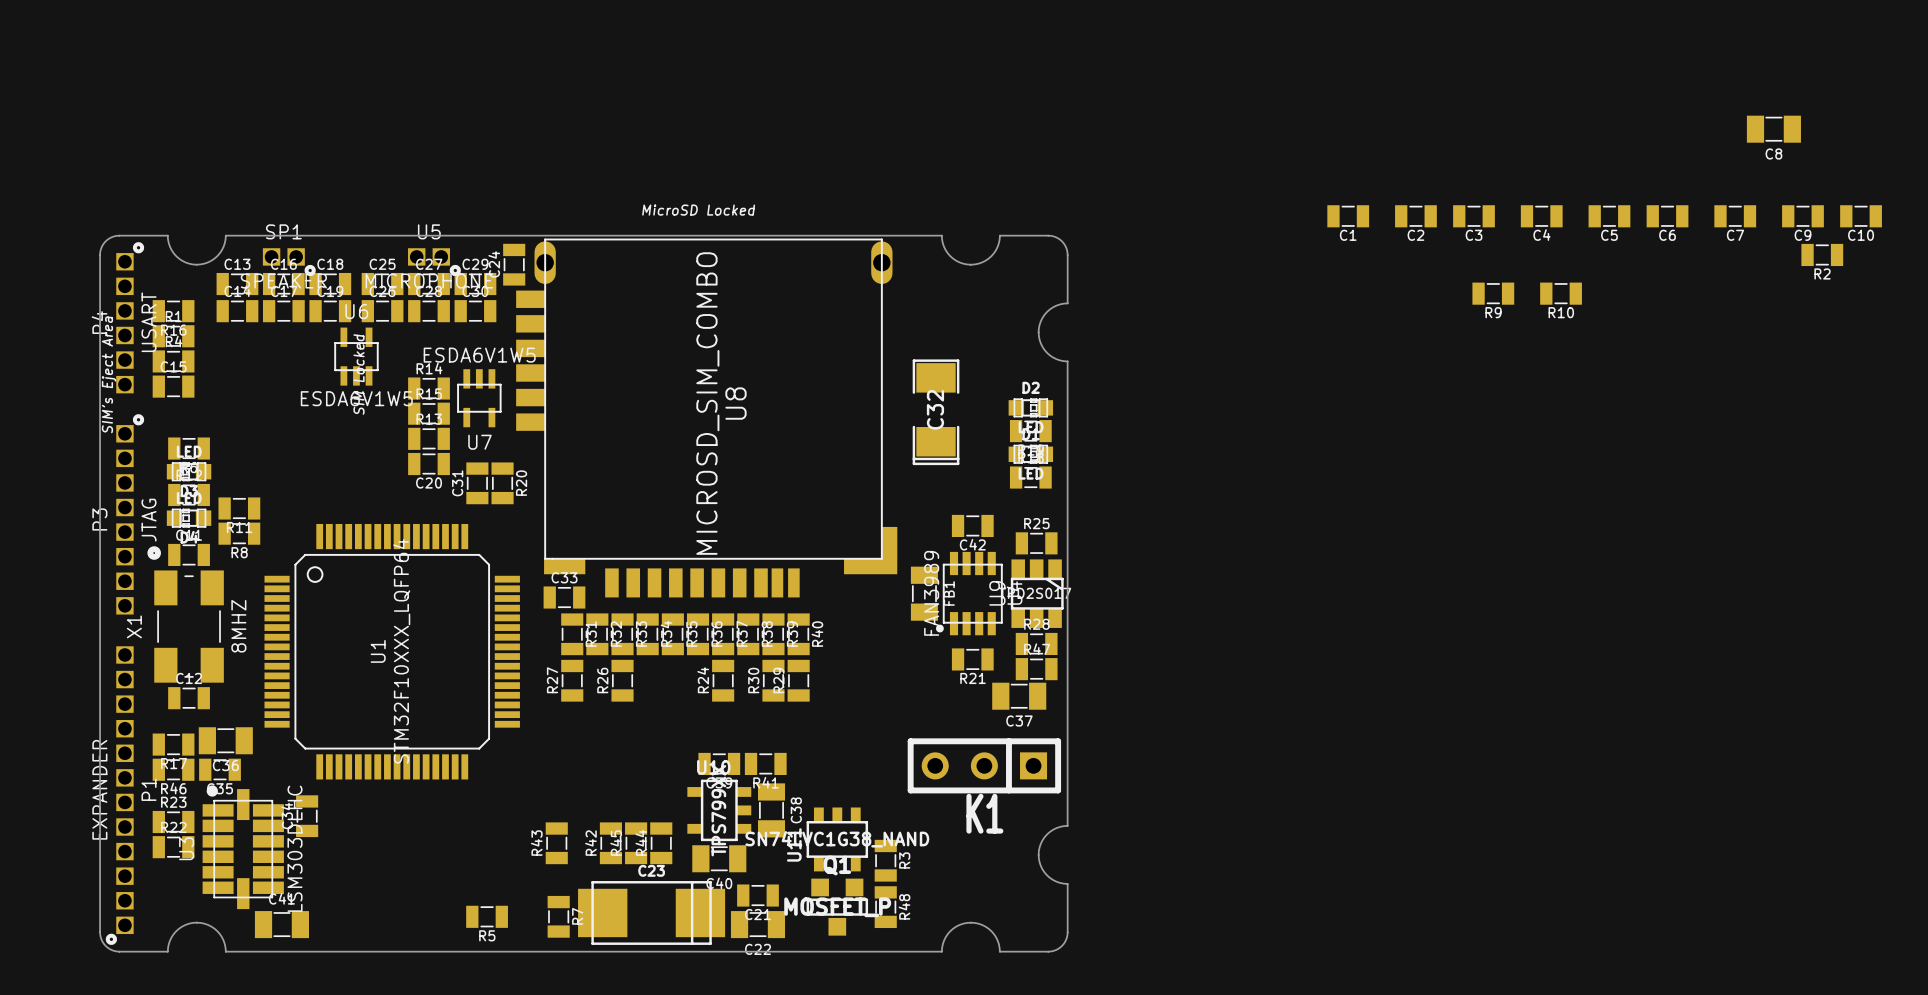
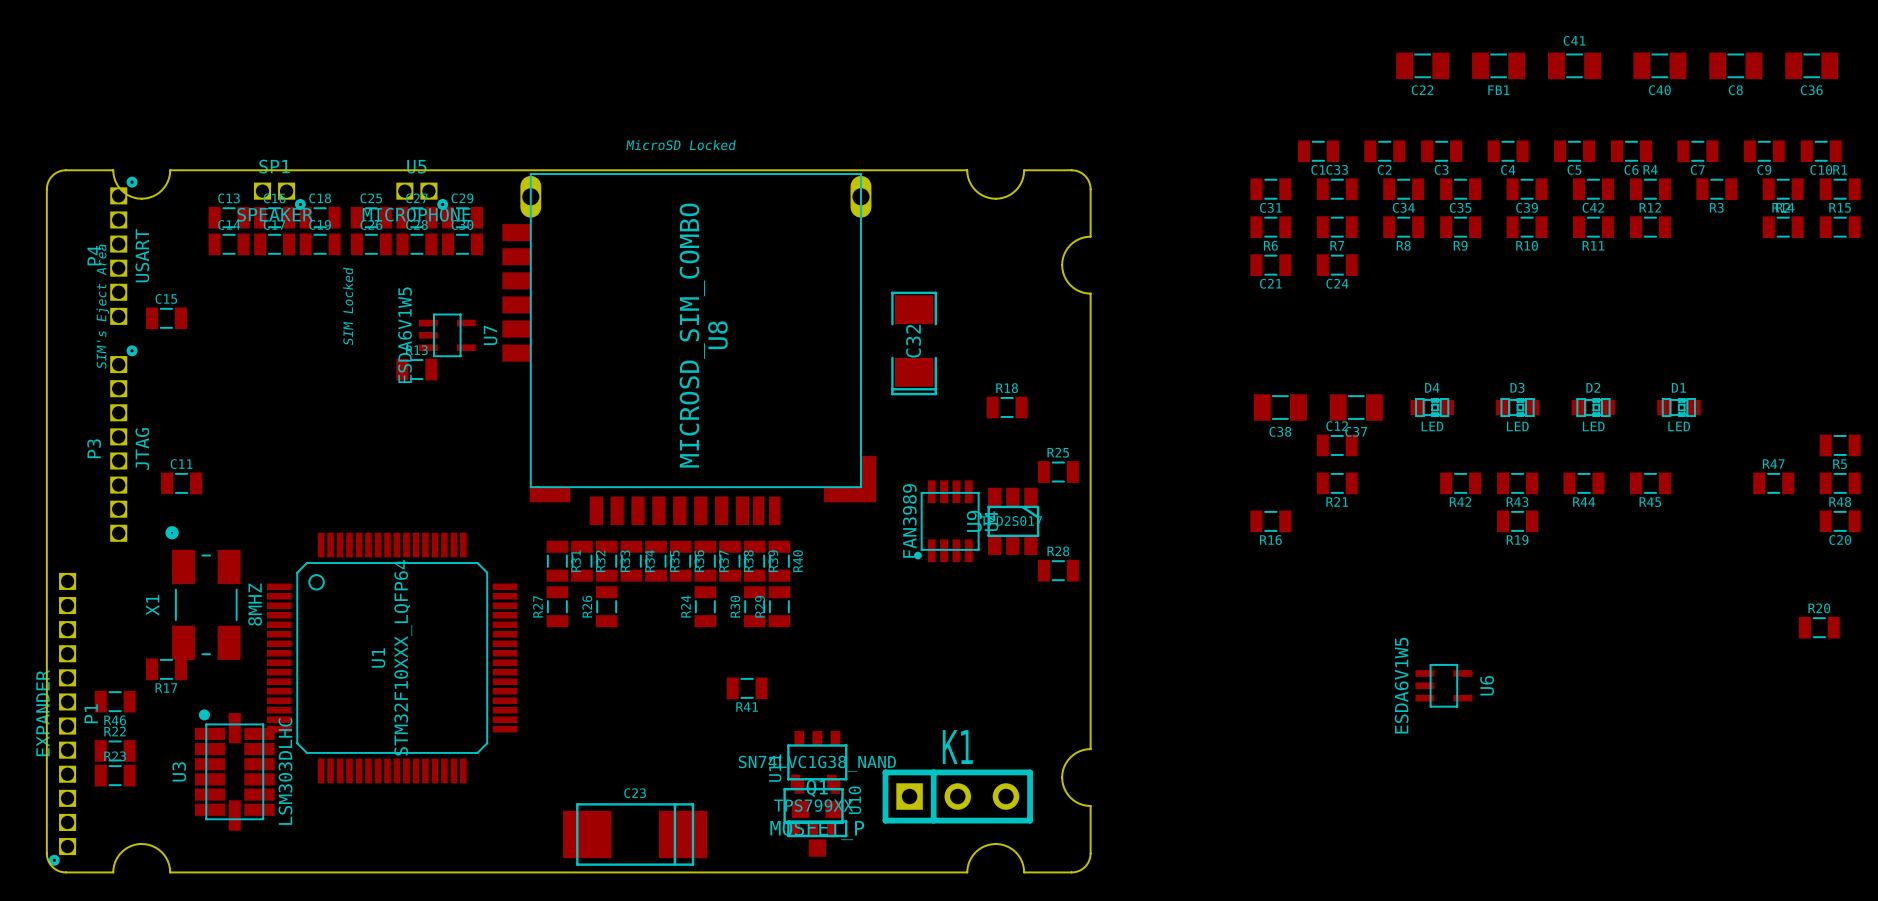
board edge: (225, 235) (223, 246) (217, 256) (200, 264) (189, 263) (179, 258) (169, 246) (167, 235) (114, 236) (104, 243) (100, 255) (100, 934) (104, 944) (114, 951) (167, 951) (171, 937) (179, 928) (189, 923) (200, 922) (217, 931) (223, 940) (225, 951) -> (217, 170) (170, 170) (168, 181) (161, 190) (145, 198) (134, 197) (124, 192) (115, 181) (113, 170) (60, 170) (50, 177) (46, 189) (47, 858) (52, 866) (60, 871) (113, 872) (115, 861) (124, 849) (134, 844) (145, 844) (161, 852) (168, 861) (170, 872) (217, 872)
board edge: (941, 235) (947, 253) (956, 260) (967, 264) (978, 263) (988, 258) (997, 246) (999, 235) (1053, 236) (1063, 243) (1067, 255) (1067, 303) (1056, 305) (1047, 311) (1040, 321) (1038, 332) (1040, 343) (1047, 352) (1056, 359) (1067, 361) (1067, 825) (1056, 828) (1047, 834) (1040, 843) (1038, 854) (1040, 866) (1047, 875) (1056, 881) (1067, 883) (1067, 934) (1063, 944) (1053, 951) (999, 951) (995, 937) (988, 928) (978, 923) (967, 922) (956, 926) (947, 934) (941, 951) -> (919, 170) (967, 170) (973, 187) (981, 194) (991, 198) (1003, 197) (1013, 192) (1022, 181) (1024, 170) (1076, 170) (1086, 177) (1090, 189) (1090, 236) (1079, 238) (1070, 245) (1064, 254) (1062, 265) (1064, 276) (1070, 285) (1079, 291) (1090, 293) (1090, 749) (1079, 751) (1070, 757) (1064, 766) (1062, 777) (1064, 788) (1070, 797) (1079, 803) (1090, 806) (1089, 858) (1085, 866) (1076, 871) (1024, 872) (1020, 858) (1013, 849) (1003, 844) (991, 844) (981, 847) (973, 855) (967, 872) (919, 872)
C24 rotation: 0° (514, 264) -> 90° clockwise (1337, 265)
C24 position: (514, 264) -> (1337, 265)
R16 position: (173, 311) -> (1270, 521)
R1 position: (173, 336) -> (1840, 189)
U6 rotation: 0° (356, 356) -> 90° clockwise (1443, 685)
U6 position: (356, 356) -> (1443, 685)
R4 position: (173, 361) -> (1650, 189)
R14 position: (429, 388) -> (1783, 227)
U7 rotation: 0° (479, 398) -> 90° counterclockwise (447, 335)
D2 position: (1030, 407) -> (1593, 407)
R15 position: (429, 413) -> (1840, 227)
R19 position: (1030, 431) -> (1517, 521)
R6 position: (189, 448) -> (1270, 227)
D1 position: (1030, 454) -> (1678, 407)
C20 position: (429, 464) -> (1840, 521)
D3 rotation: 0° (189, 471) -> 180° (1517, 407)
D3 position: (189, 471) -> (1517, 407)
C31 rotation: 0° (477, 483) -> 90° clockwise (1270, 189)
C31 position: (477, 483) -> (1270, 189)
R20 rotation: 0° (502, 483) -> 90° clockwise (1819, 627)
R20 position: (502, 483) -> (1819, 627)
R12 position: (189, 494) -> (1650, 227)
R11 position: (239, 508) -> (1593, 227)
D4 rotation: 0° (189, 518) -> 180° (1432, 407)
D4 position: (189, 518) -> (1432, 407)
C42 position: (972, 525) -> (1593, 189)
R8 position: (239, 533) -> (1403, 227)
R25 position: (1036, 543) -> (1058, 472)
FB1 rotation: 0° (924, 593) -> 90° clockwise (1498, 65)
FB1 position: (924, 593) -> (1498, 65)
C33 position: (564, 597) -> (1337, 189)
X1 position: (185, 614) -> (202, 593)
R28 position: (1036, 643) -> (1058, 570)
U1 position: (392, 651) -> (392, 657)
R21 position: (972, 659) -> (1337, 483)
R47 position: (1036, 669) -> (1773, 483)
C37 position: (1019, 696) -> (1356, 407)
C12 position: (189, 698) -> (1337, 445)
C36 position: (225, 740) -> (1811, 65)
C39 position: (719, 763) -> (1527, 189)
K1 rotation: 0° (984, 765) -> 180° (957, 796)
K1 position: (984, 765) -> (957, 796)
R46 position: (173, 769) -> (115, 701)
C35 position: (220, 769) -> (1460, 189)
P1 position: (119, 795) -> (62, 719)
U10 rotation: 0° (719, 810) -> 90° clockwise (813, 806)
U10 position: (719, 810) -> (813, 806)
C38 rotation: 0° (771, 810) -> 90° clockwise (1280, 407)
C38 position: (771, 810) -> (1280, 407)
C34 rotation: 0° (307, 816) -> 90° clockwise (1403, 189)
C34 position: (307, 816) -> (1403, 189)
R23 position: (173, 822) -> (115, 775)
R43 rotation: 0° (556, 843) -> 90° clockwise (1517, 483)
R43 position: (556, 843) -> (1517, 483)
R42 rotation: 0° (610, 843) -> 90° clockwise (1460, 483)
R42 position: (610, 843) -> (1460, 483)
R45 rotation: 0° (636, 843) -> 90° clockwise (1650, 483)
R45 position: (636, 843) -> (1650, 483)
R44 rotation: 0° (661, 843) -> 90° clockwise (1583, 483)
R44 position: (661, 843) -> (1583, 483)
R22 position: (173, 847) -> (115, 750)
C40 position: (719, 858) -> (1659, 65)
R3 rotation: 0° (885, 860) -> 90° clockwise (1716, 189)
R3 position: (885, 860) -> (1716, 189)
C21 position: (757, 895) -> (1270, 265)
R48 rotation: 0° (885, 907) -> 90° clockwise (1840, 483)
R48 position: (885, 907) -> (1840, 483)
R5 position: (487, 916) -> (1840, 445)
R7 rotation: 0° (558, 916) -> 90° clockwise (1337, 227)
R7 position: (558, 916) -> (1337, 227)
C41 position: (281, 924) -> (1574, 65)
C22 position: (757, 924) -> (1422, 65)

